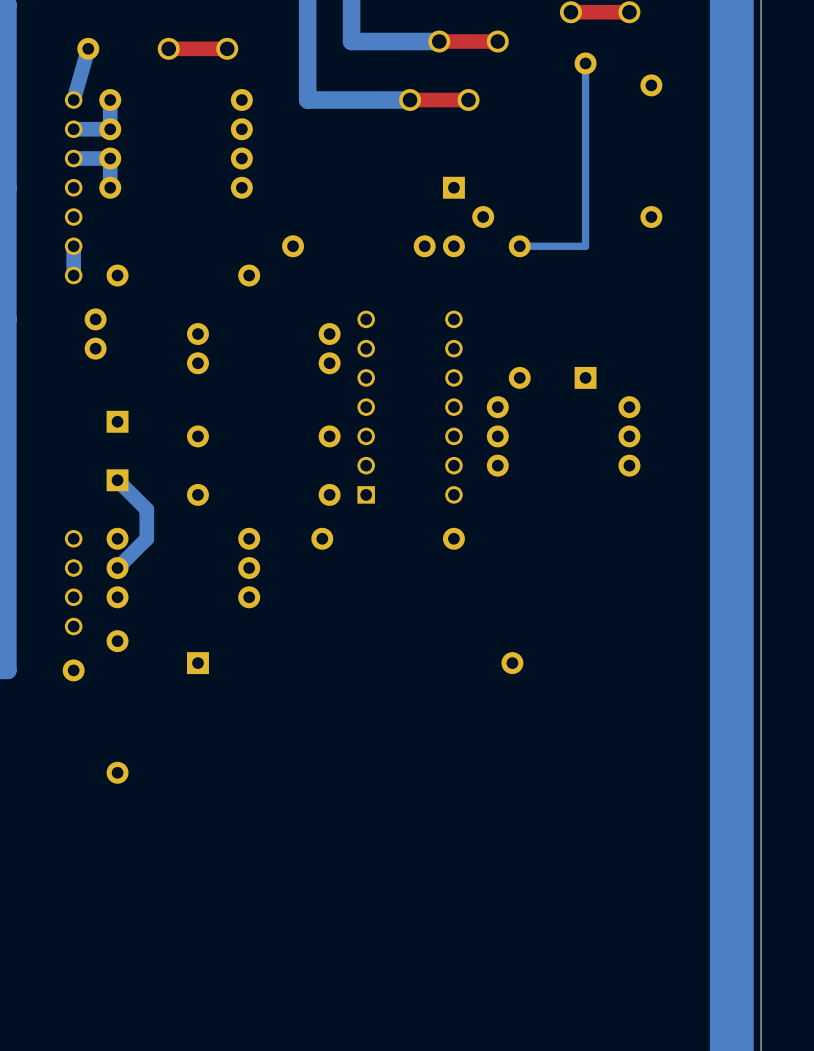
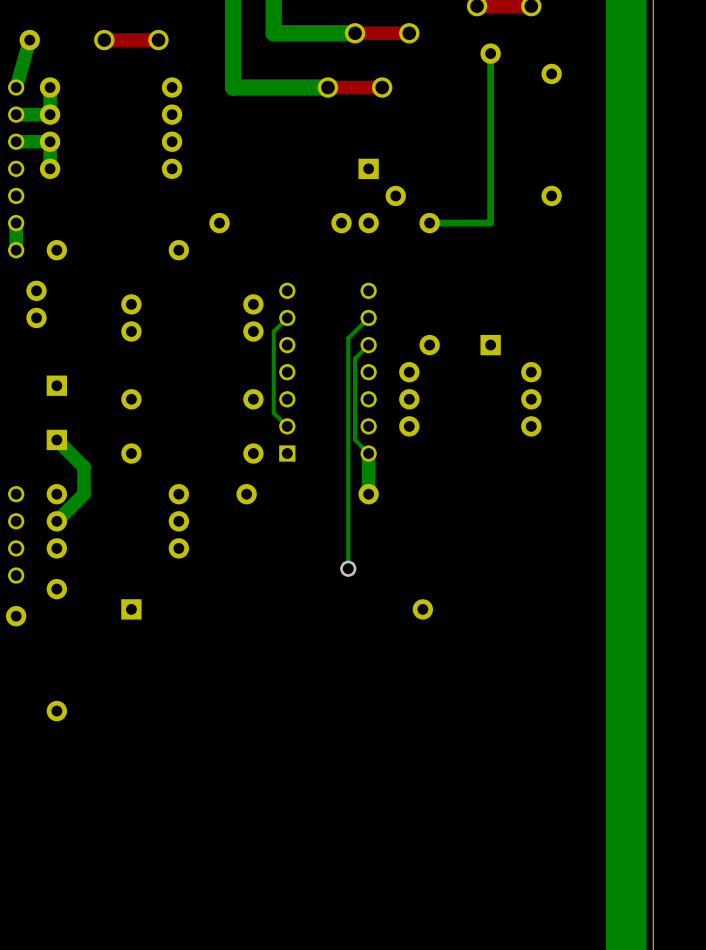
bottom track: none -> (287, 317) (273, 331) (273, 412) (287, 426)
bottom track: none -> (368, 317) (348, 338) (348, 568)
bottom track: none -> (368, 345) (355, 358) (355, 439) (368, 453) (368, 494)
via: none -> (348, 568)

